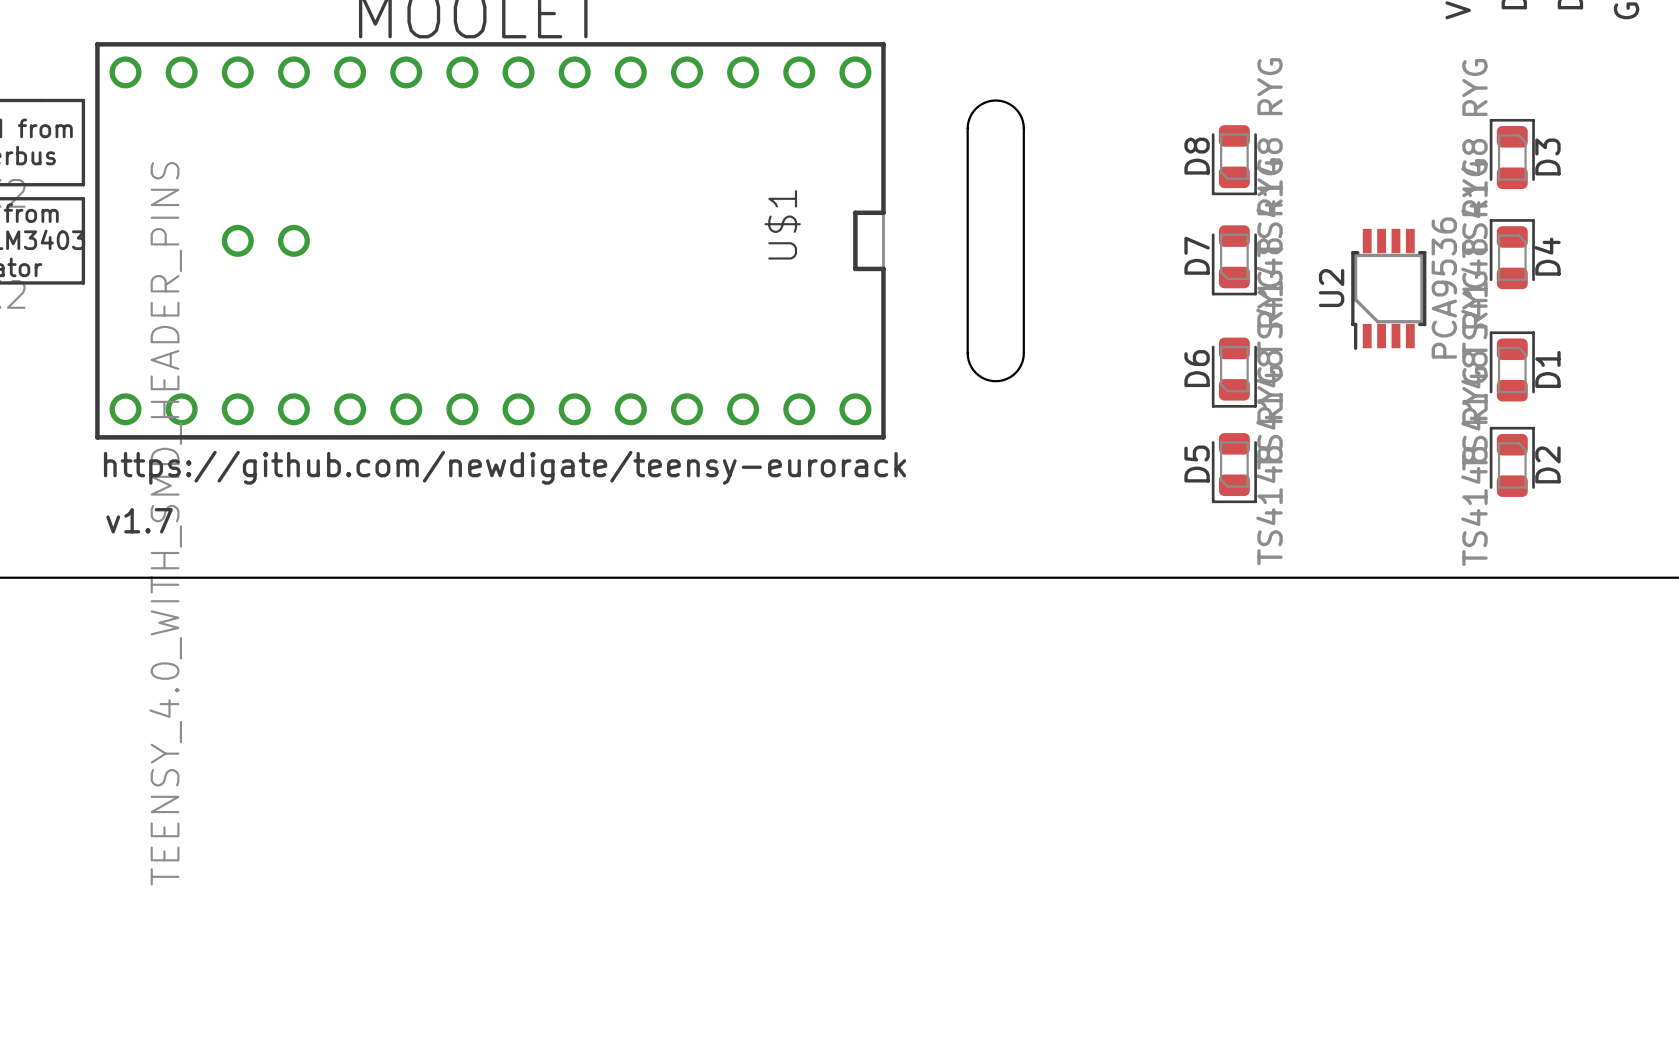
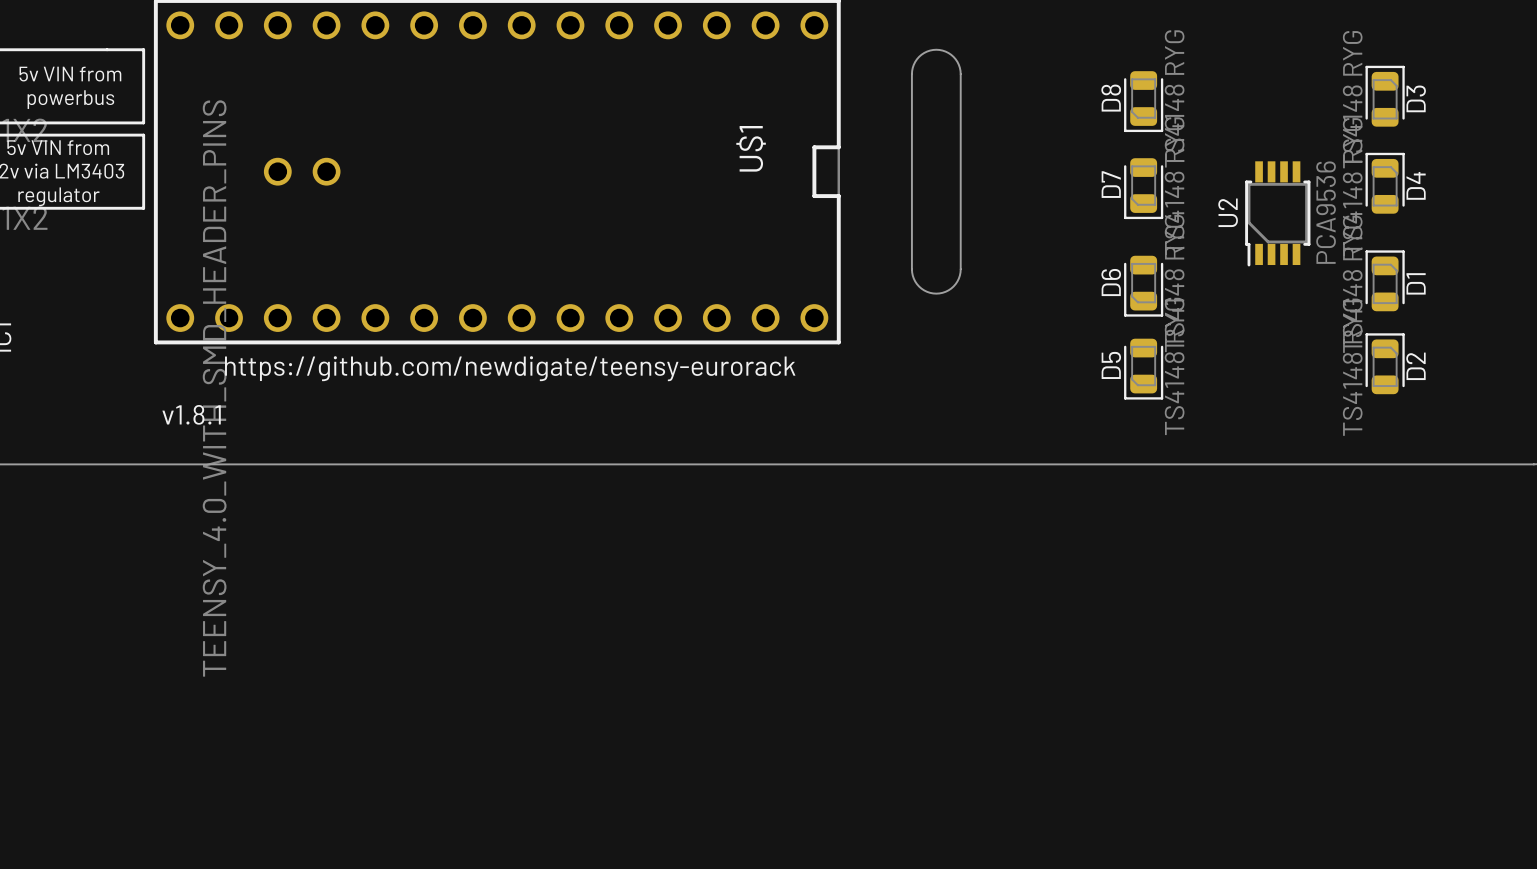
text: v1.7 (139, 520) -> v1.8.1 (191, 414)

